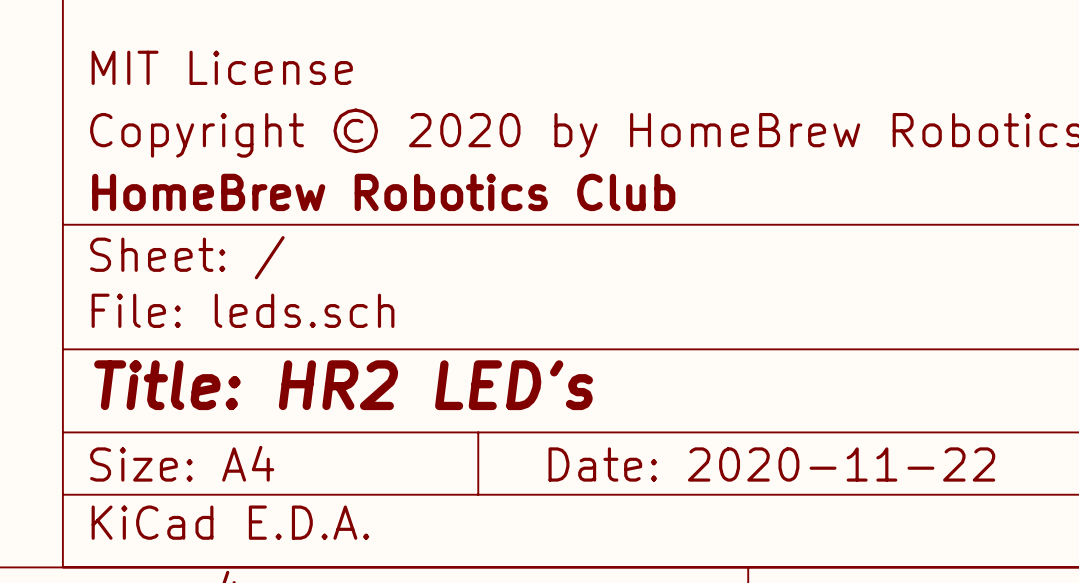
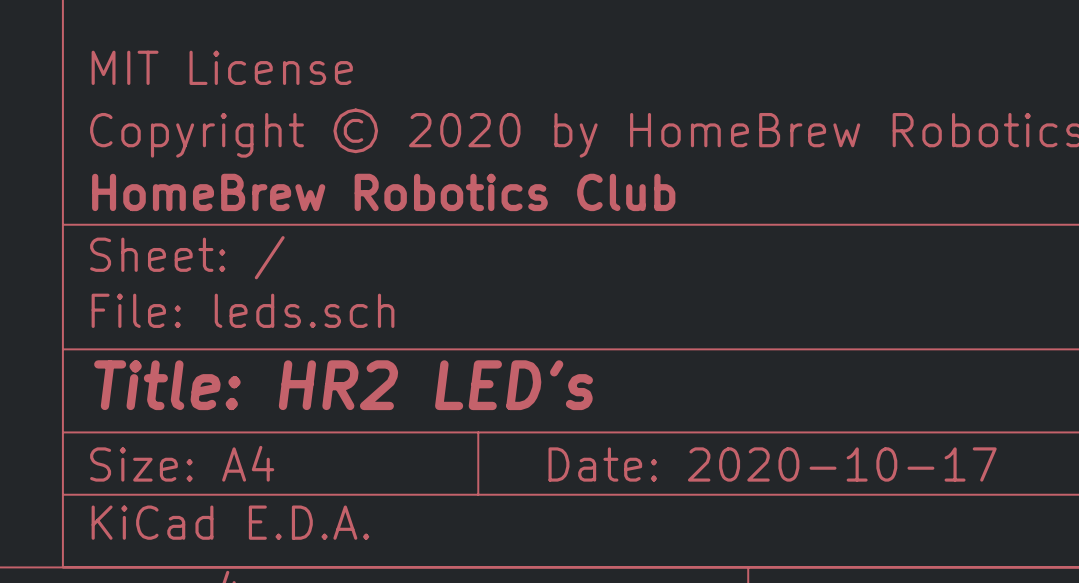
title block: Date: 2020-11-22 (771, 464) -> Date: 2020-10-17 (772, 464)

